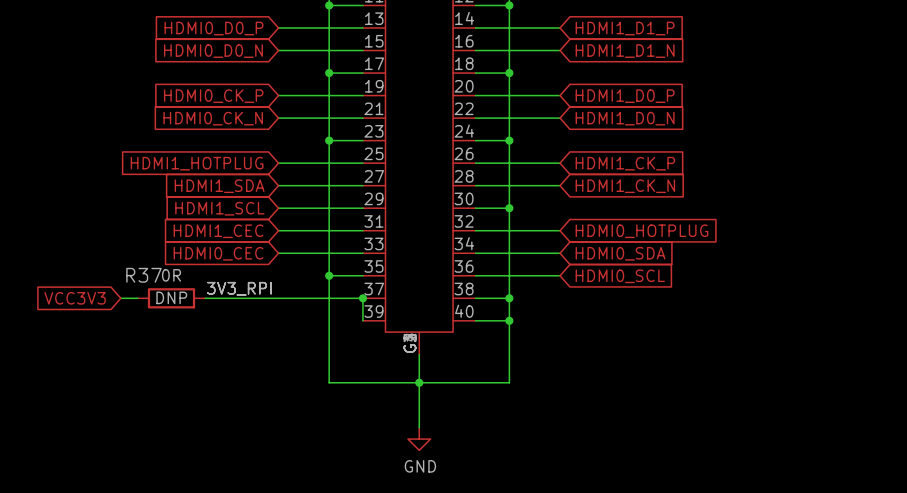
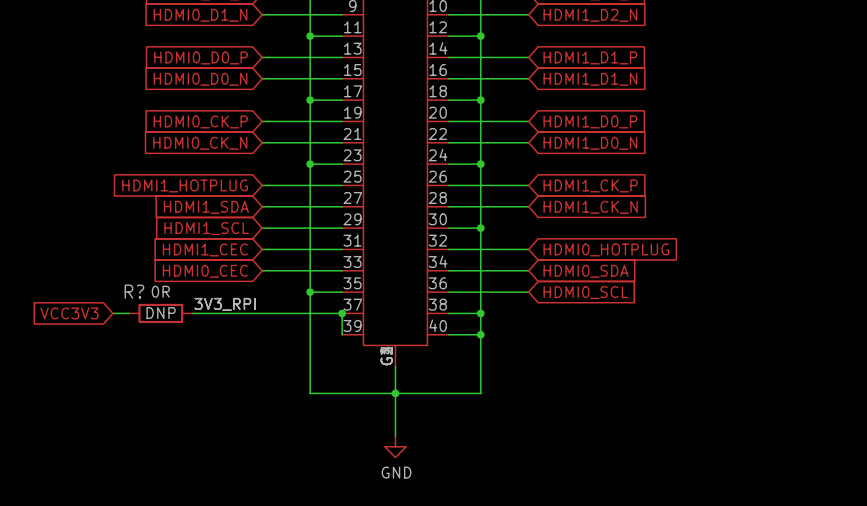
R37 name: R37 (143, 275) -> R? (134, 291)

